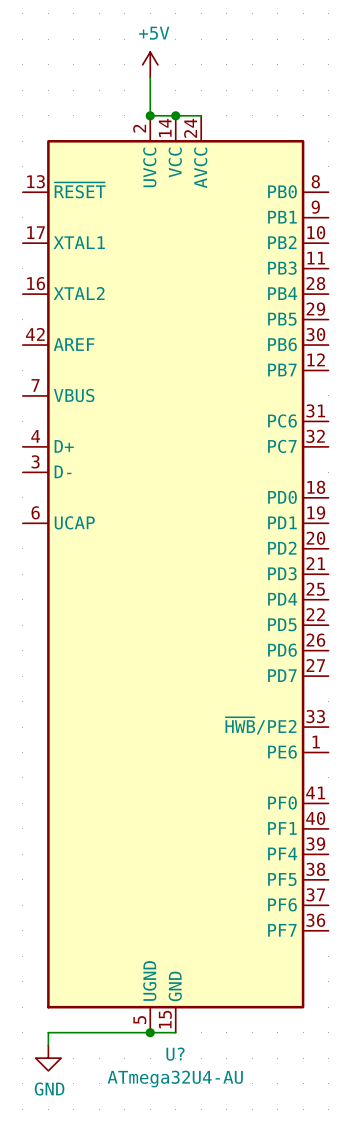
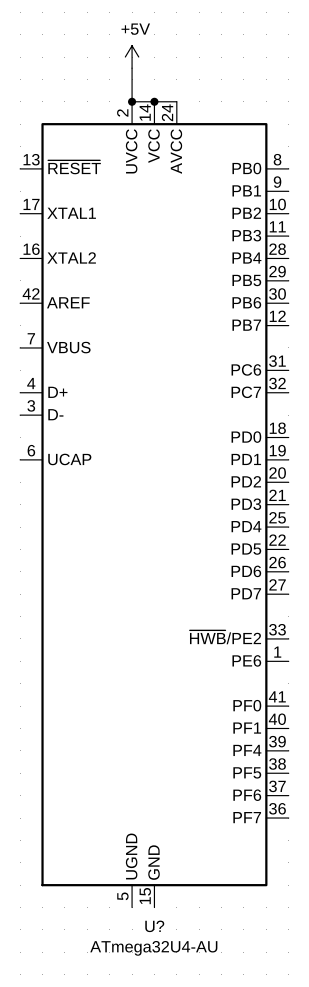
junction: (150, 1032) -> none
wire: (175, 1032) (48, 1032) (48, 1045) -> none
power symbol: GND (48, 1058) -> none

